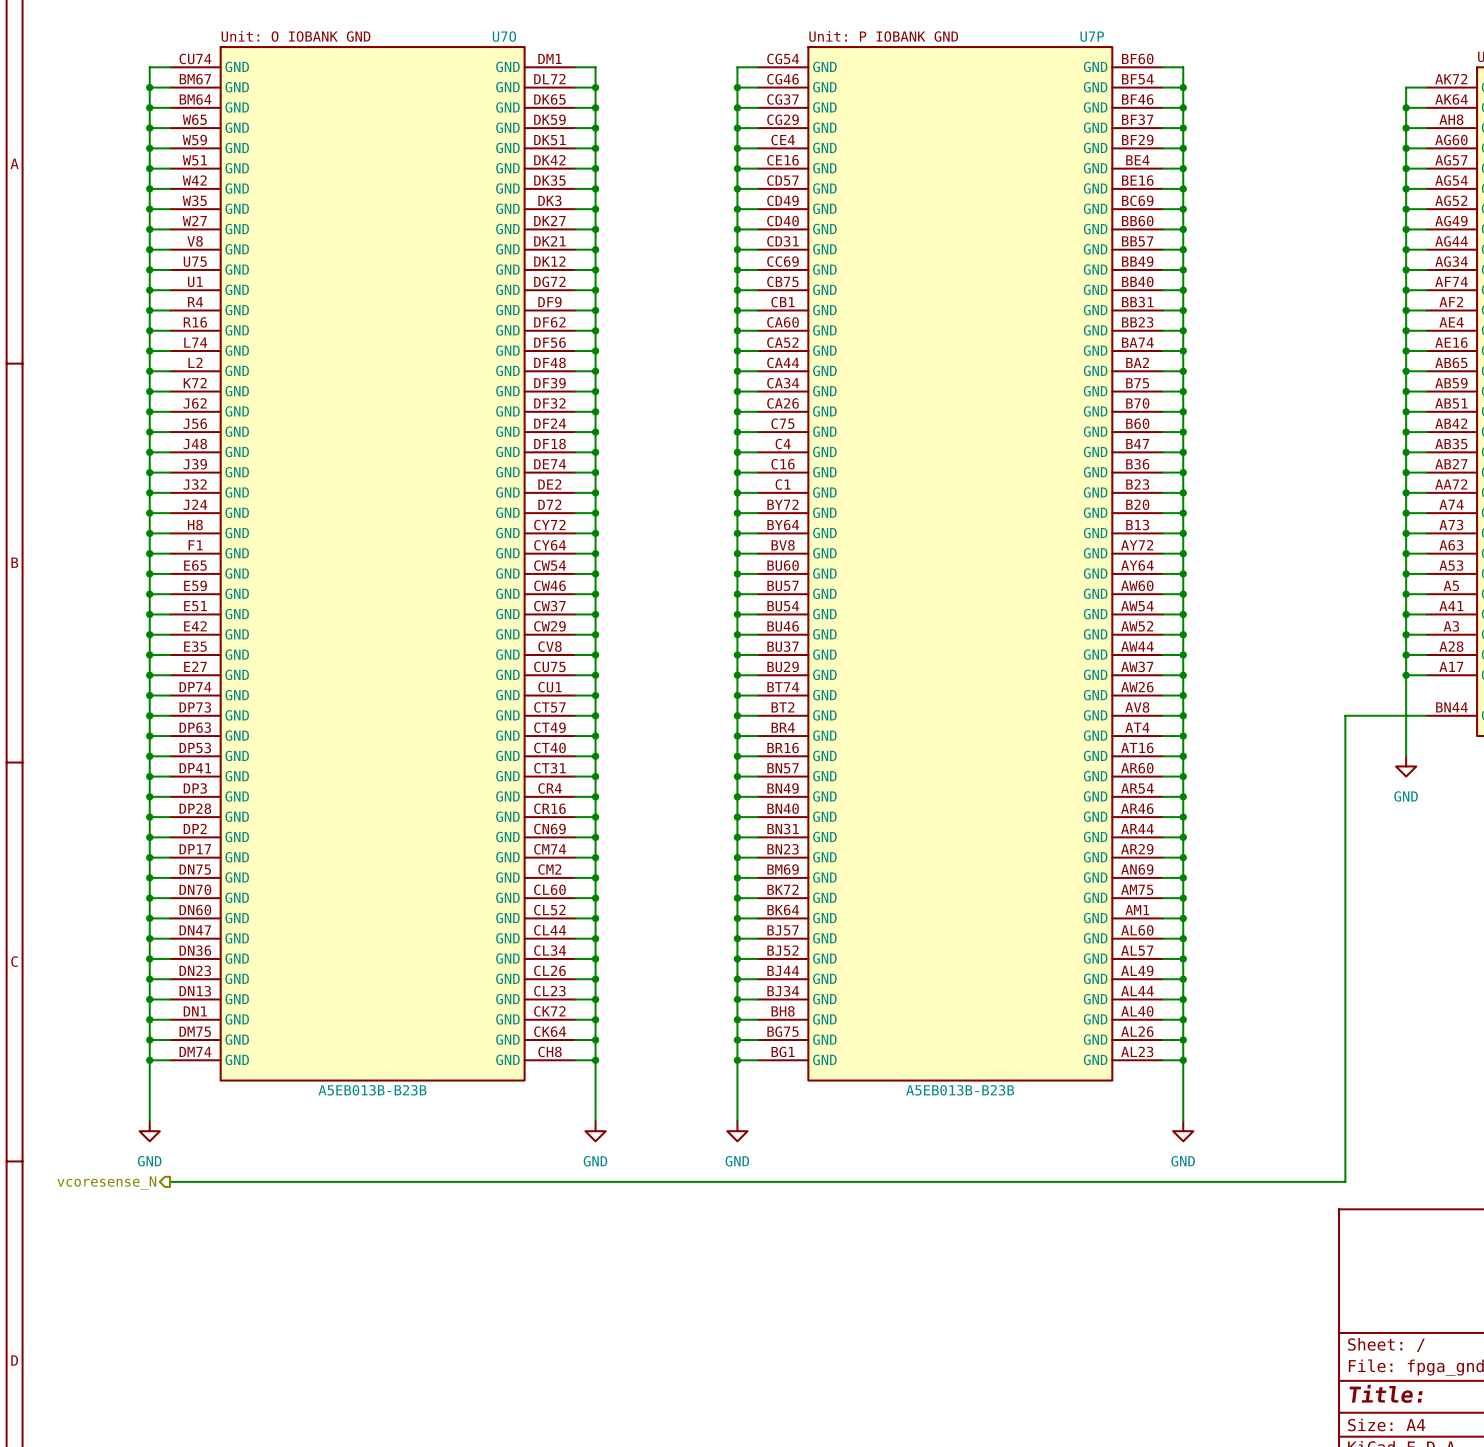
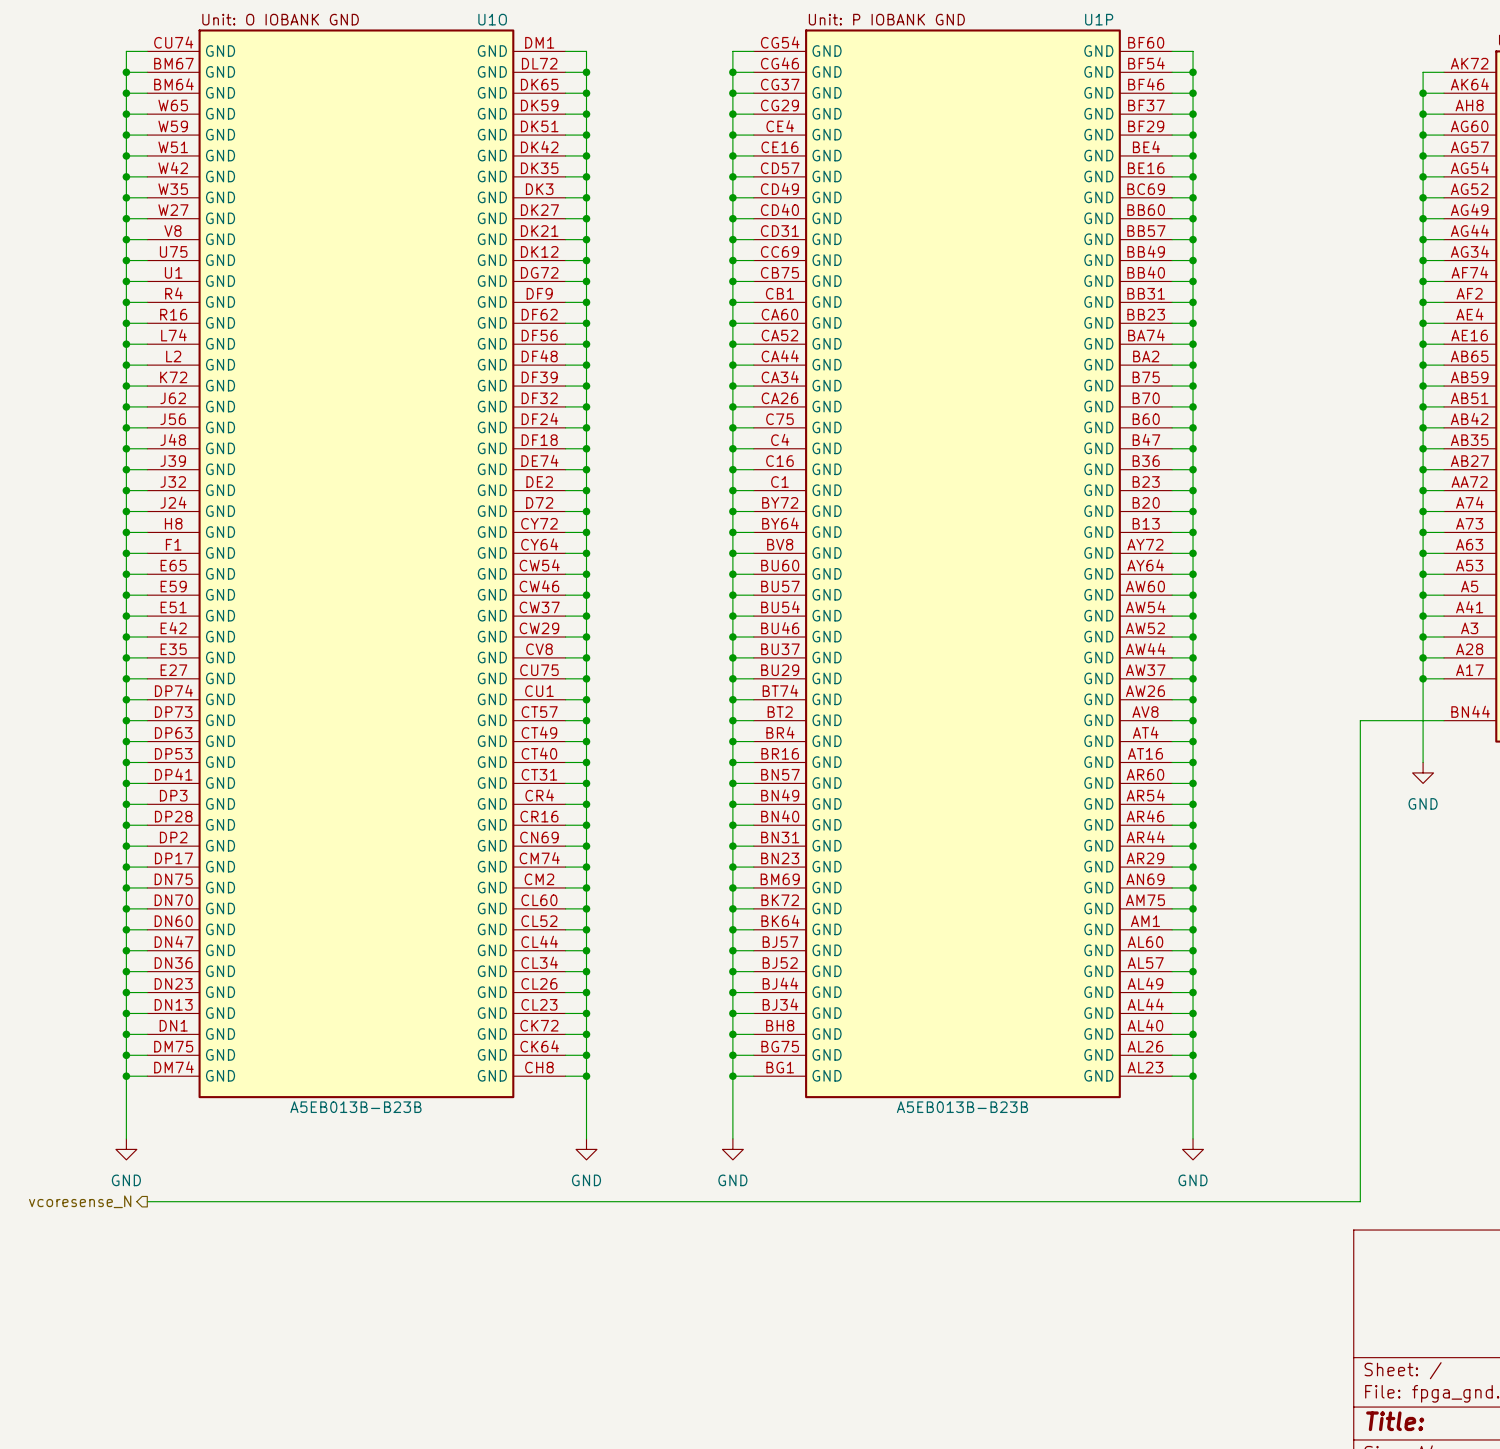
U7O name: U7O (504, 36) -> U1O (492, 19)
U7P name: U7P (1092, 36) -> U1P (1099, 19)

